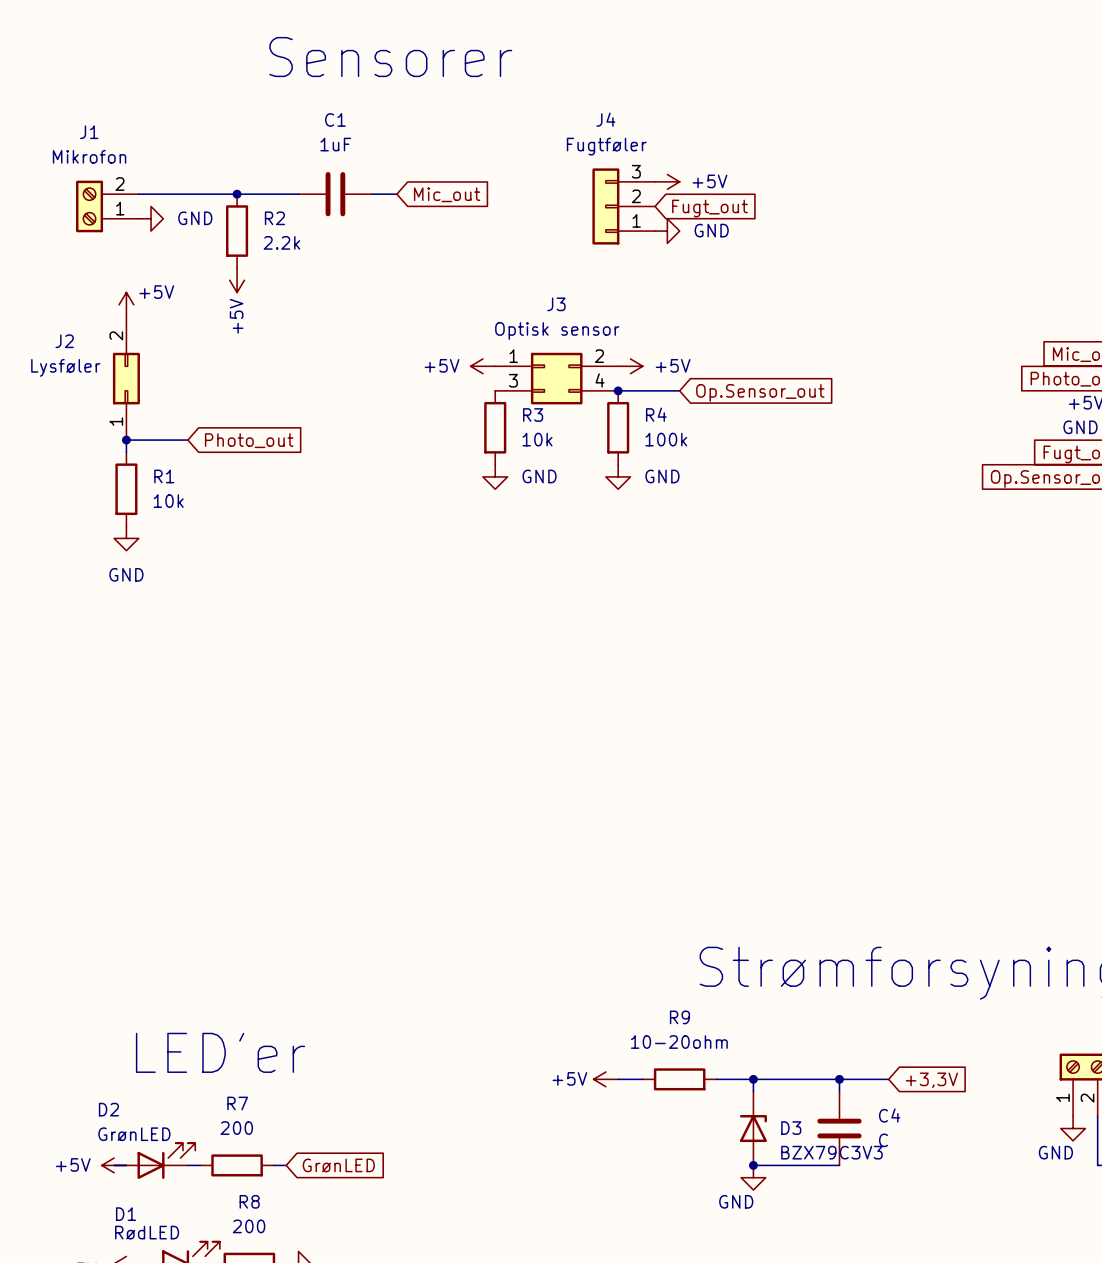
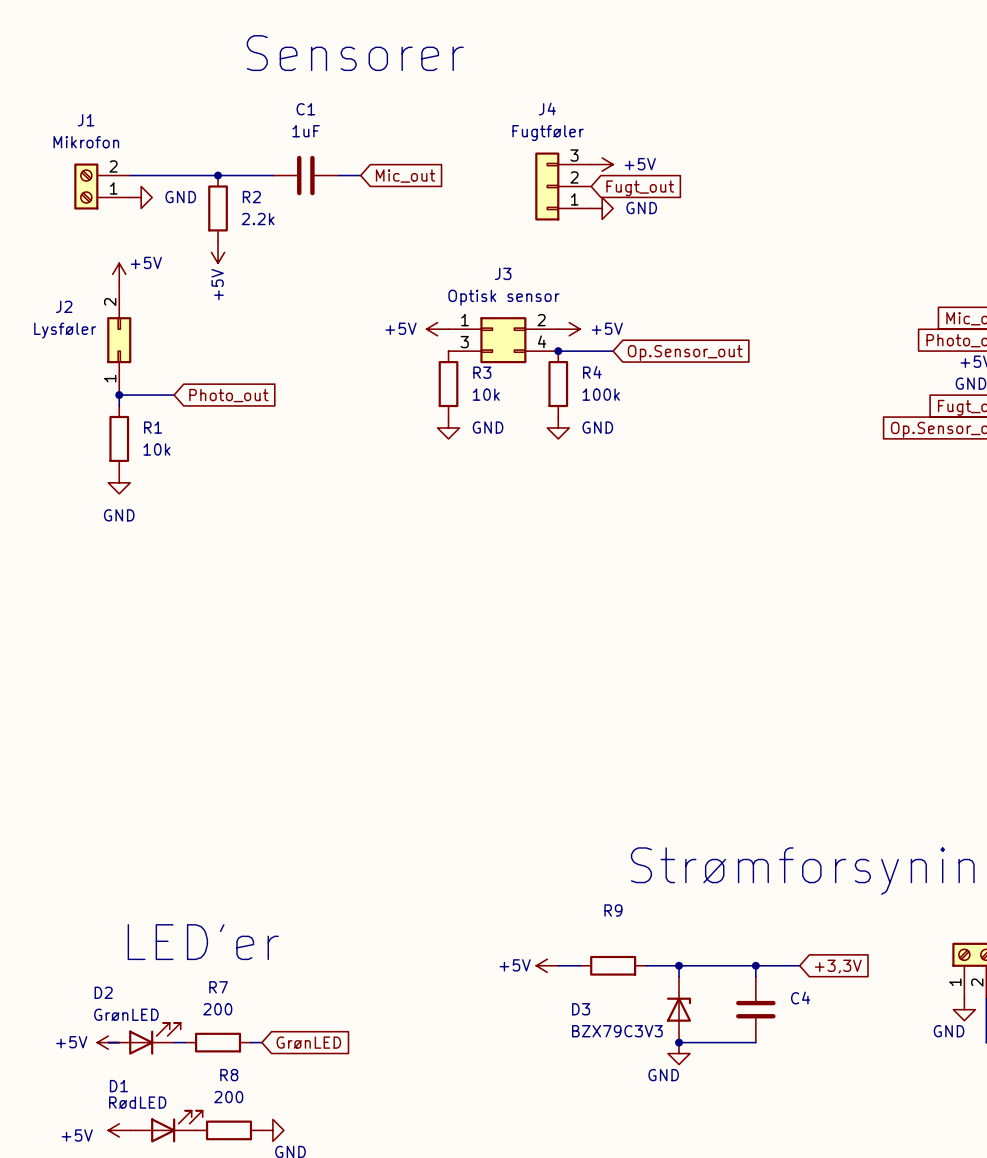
R9 value: 10-20ohm (679, 1042) -> none
D3 name position: D3 (791, 1128) -> D3 (581, 1009)
C4 value: C (883, 1140) -> none
D3 value position: BZX79C3V3 (831, 1152) -> BZX79C3V3 (617, 1031)

